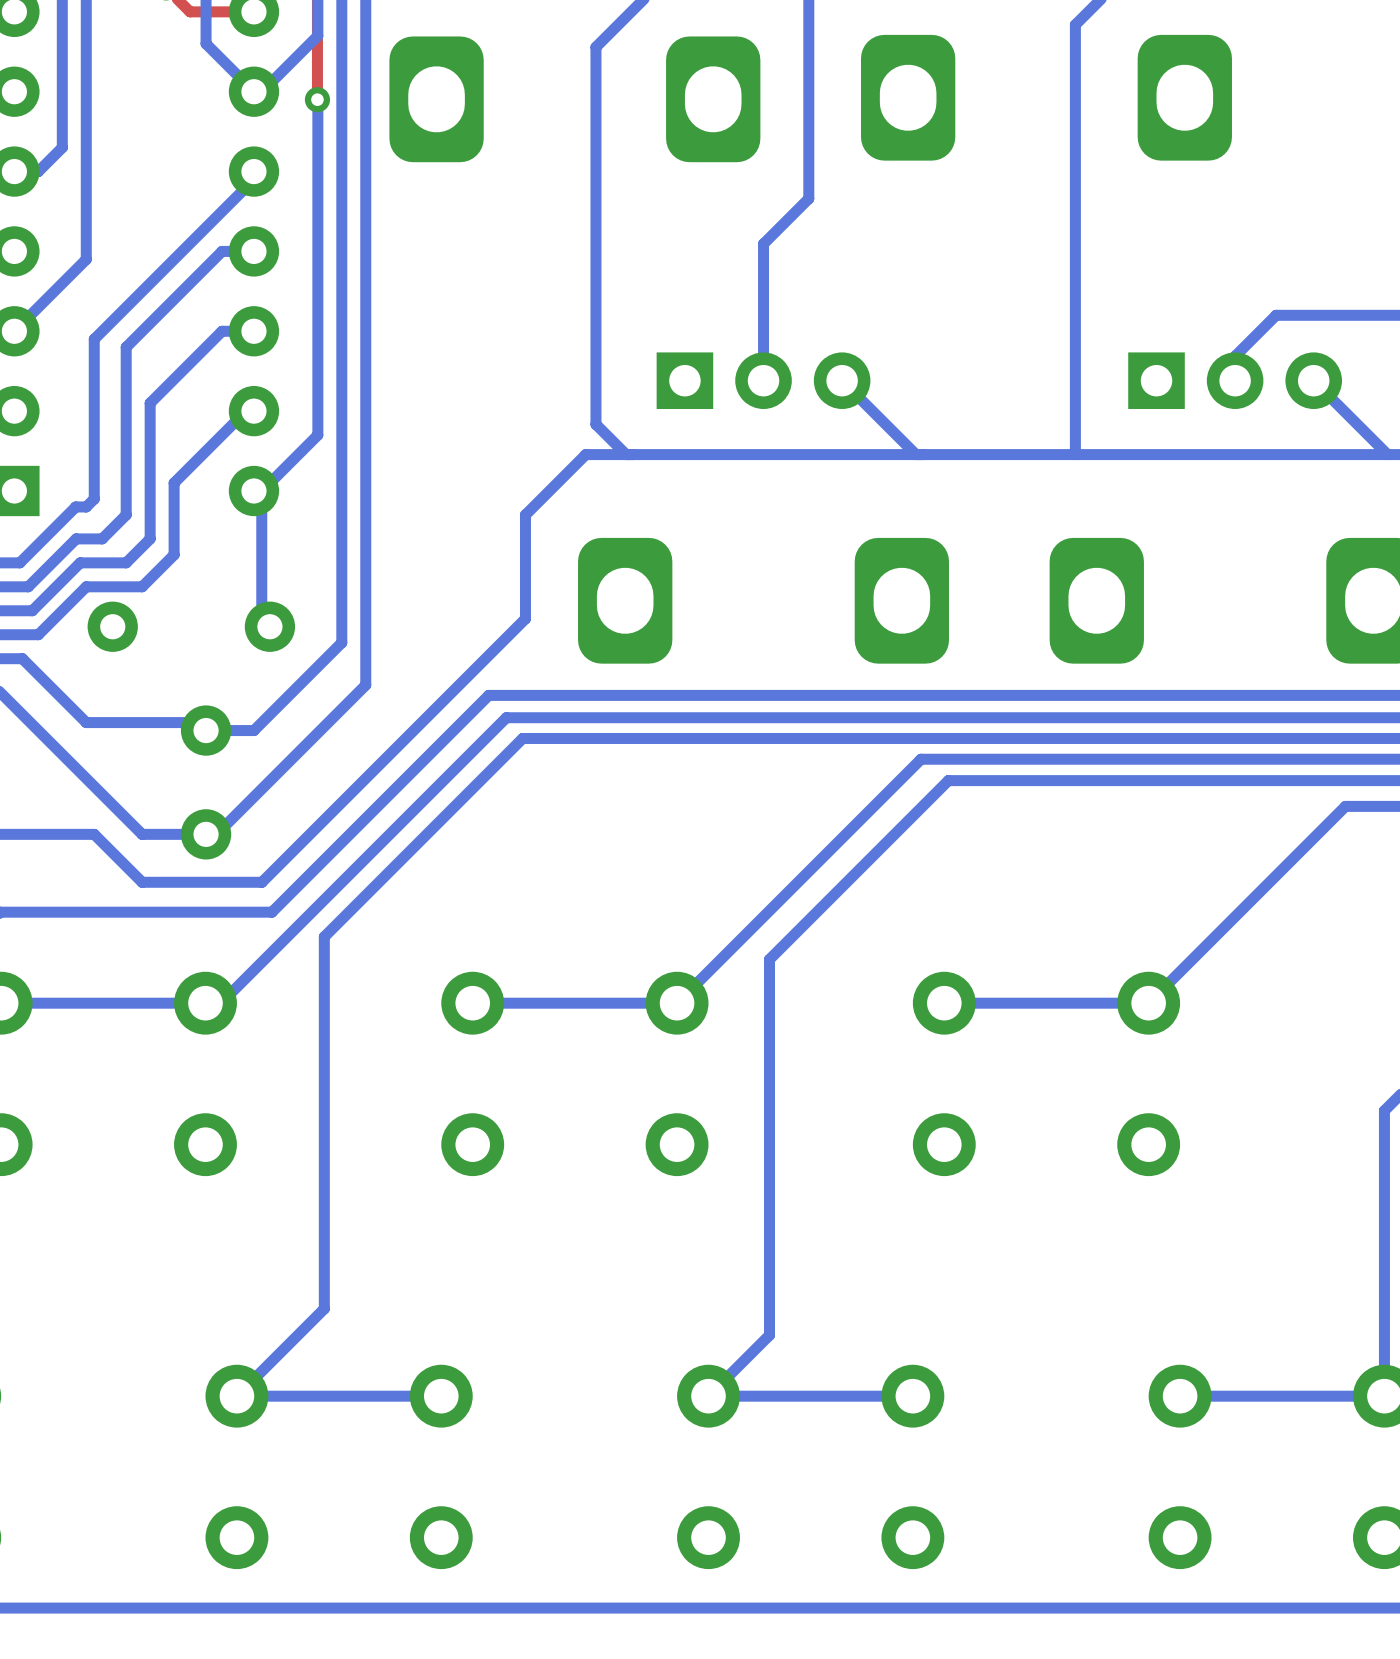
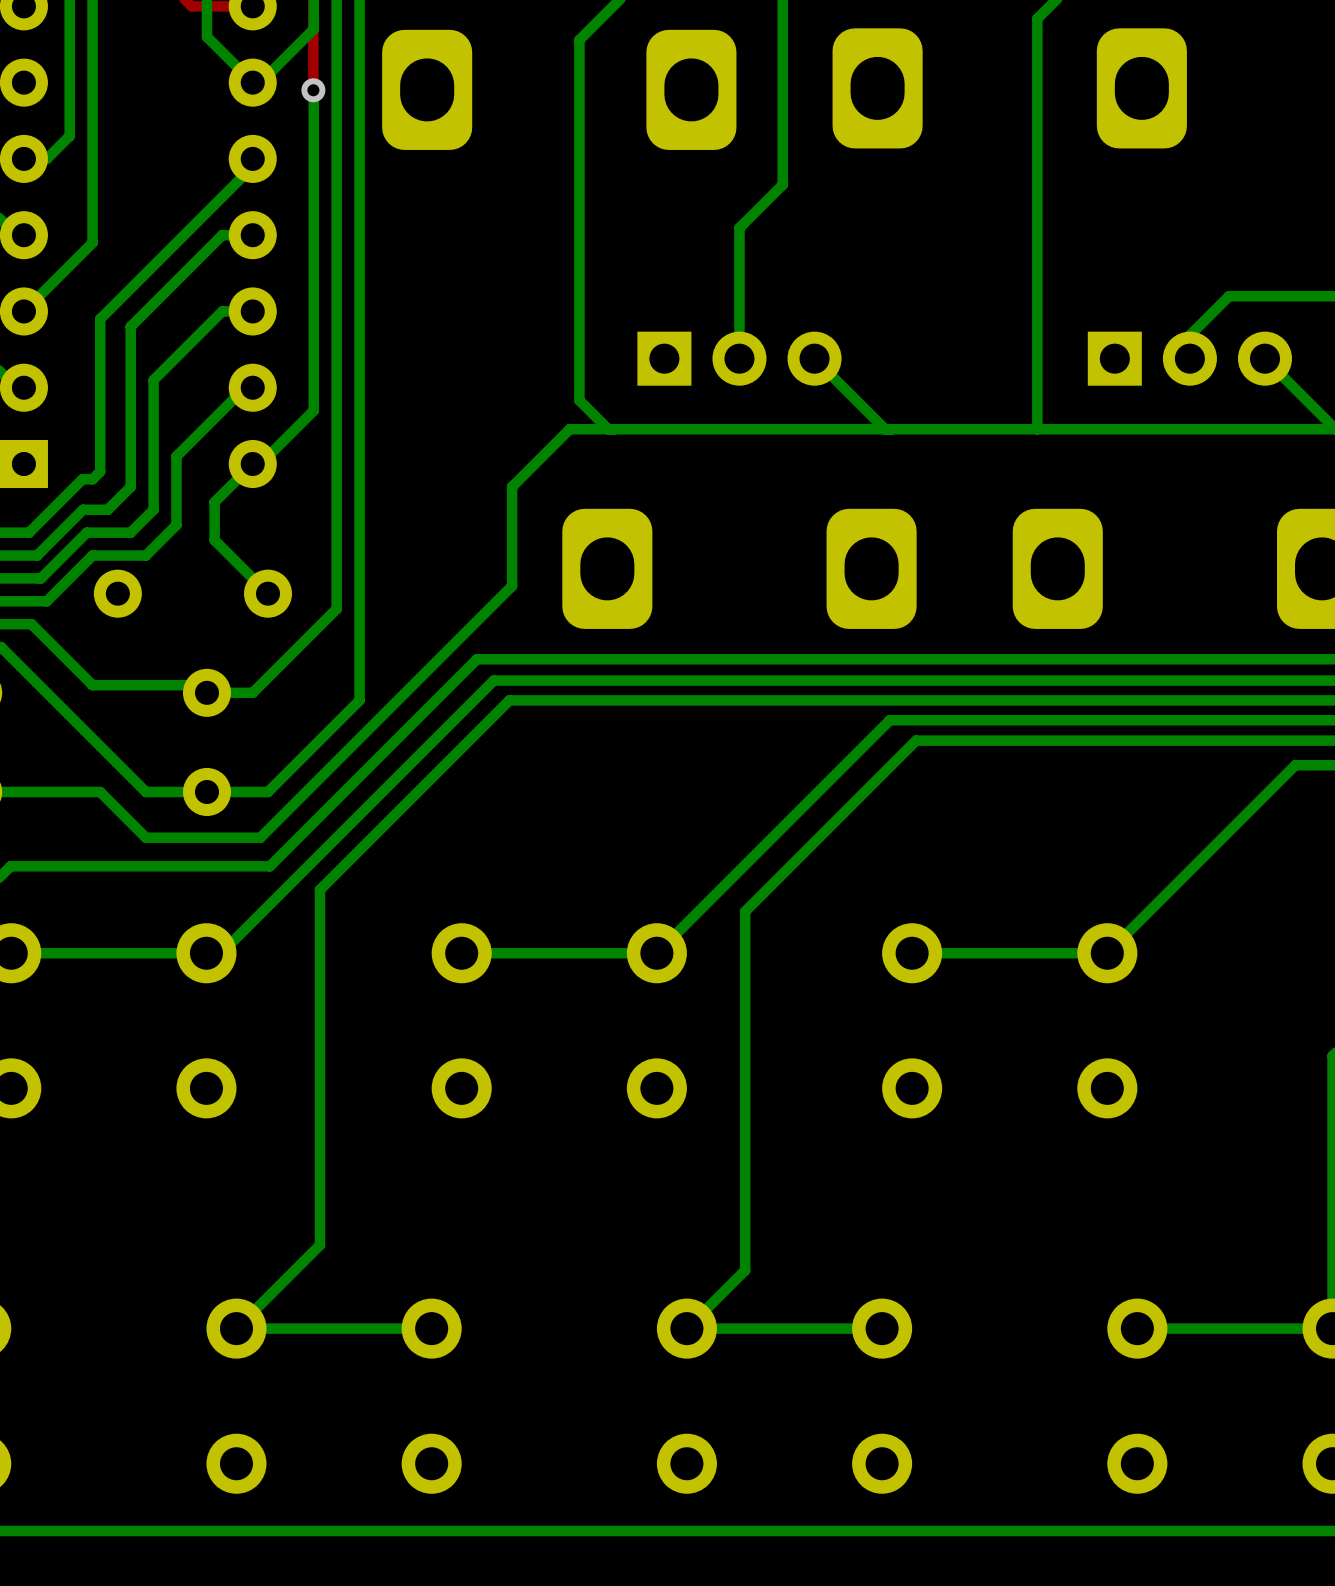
bottom track: (253, 490) (261, 498) (261, 618) -> (252, 464) (214, 502) (214, 540) (260, 585)
bottom track: (365, 685) (216, 834) -> (359, 649) (359, 700) (268, 791) (216, 791)

